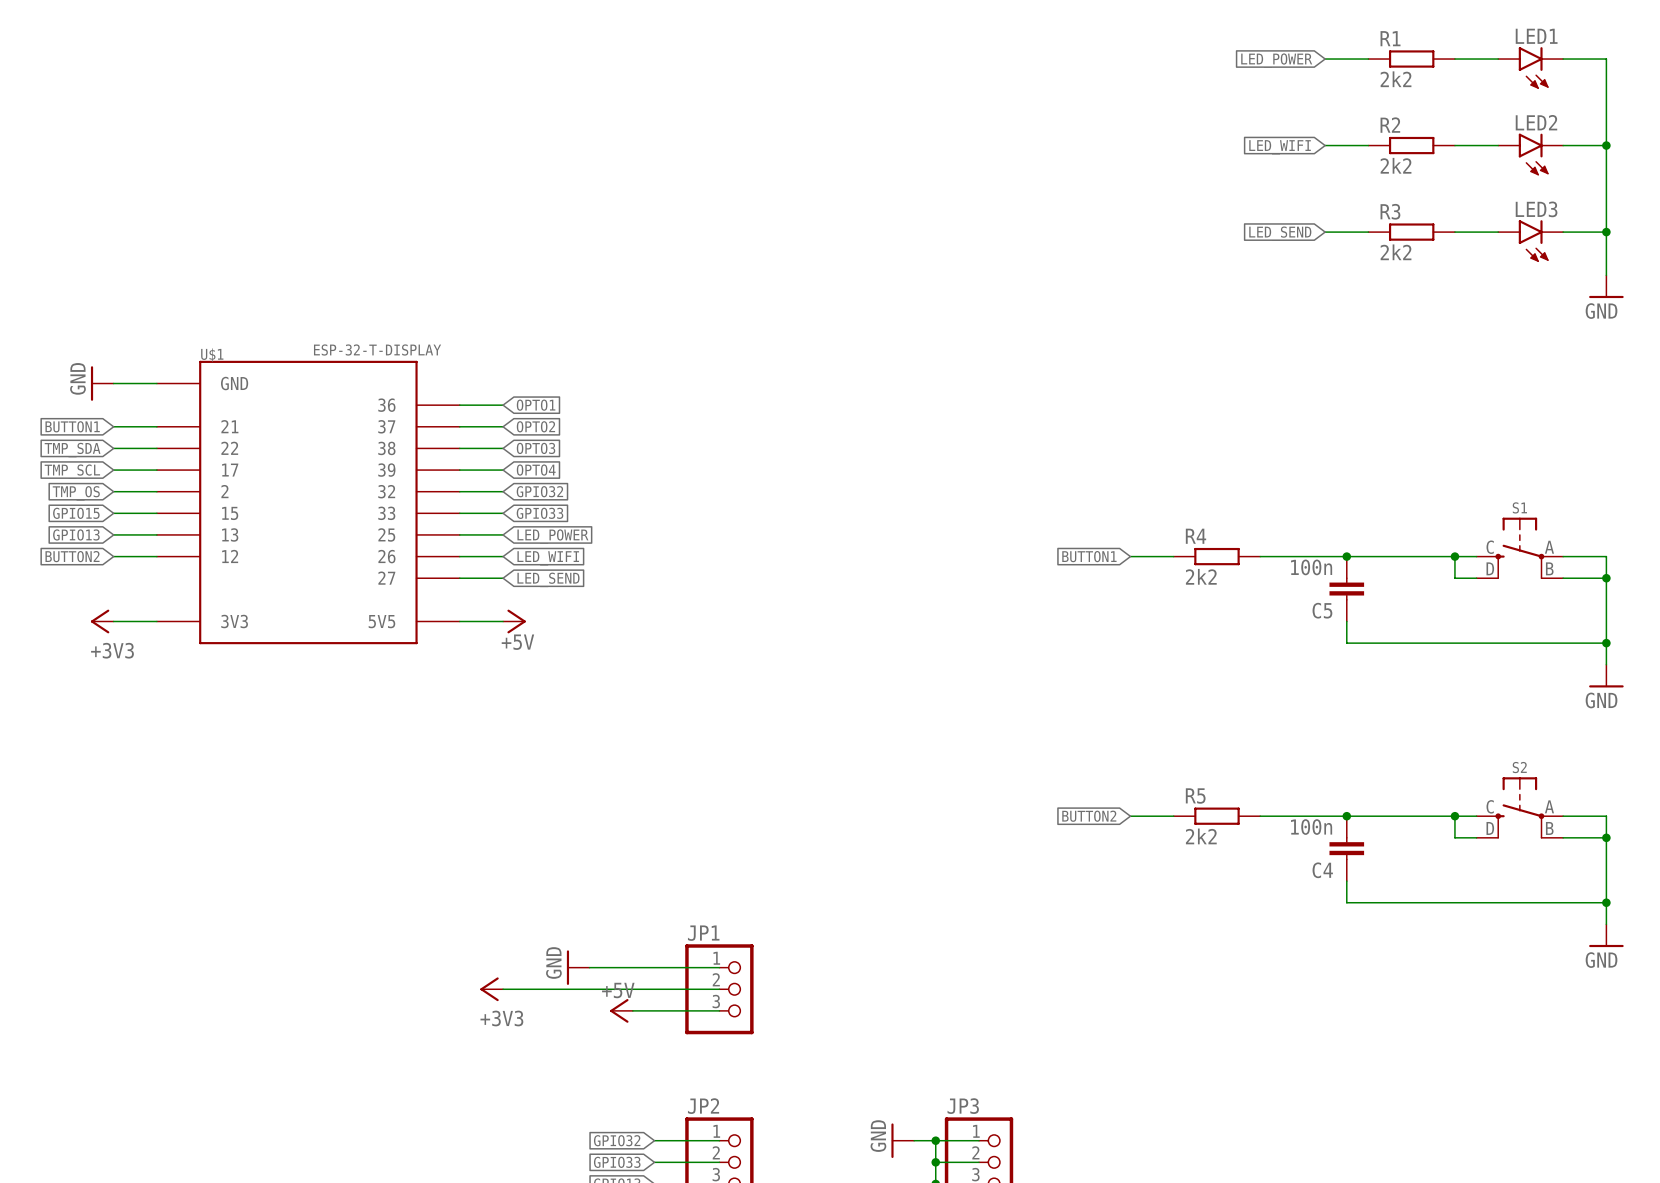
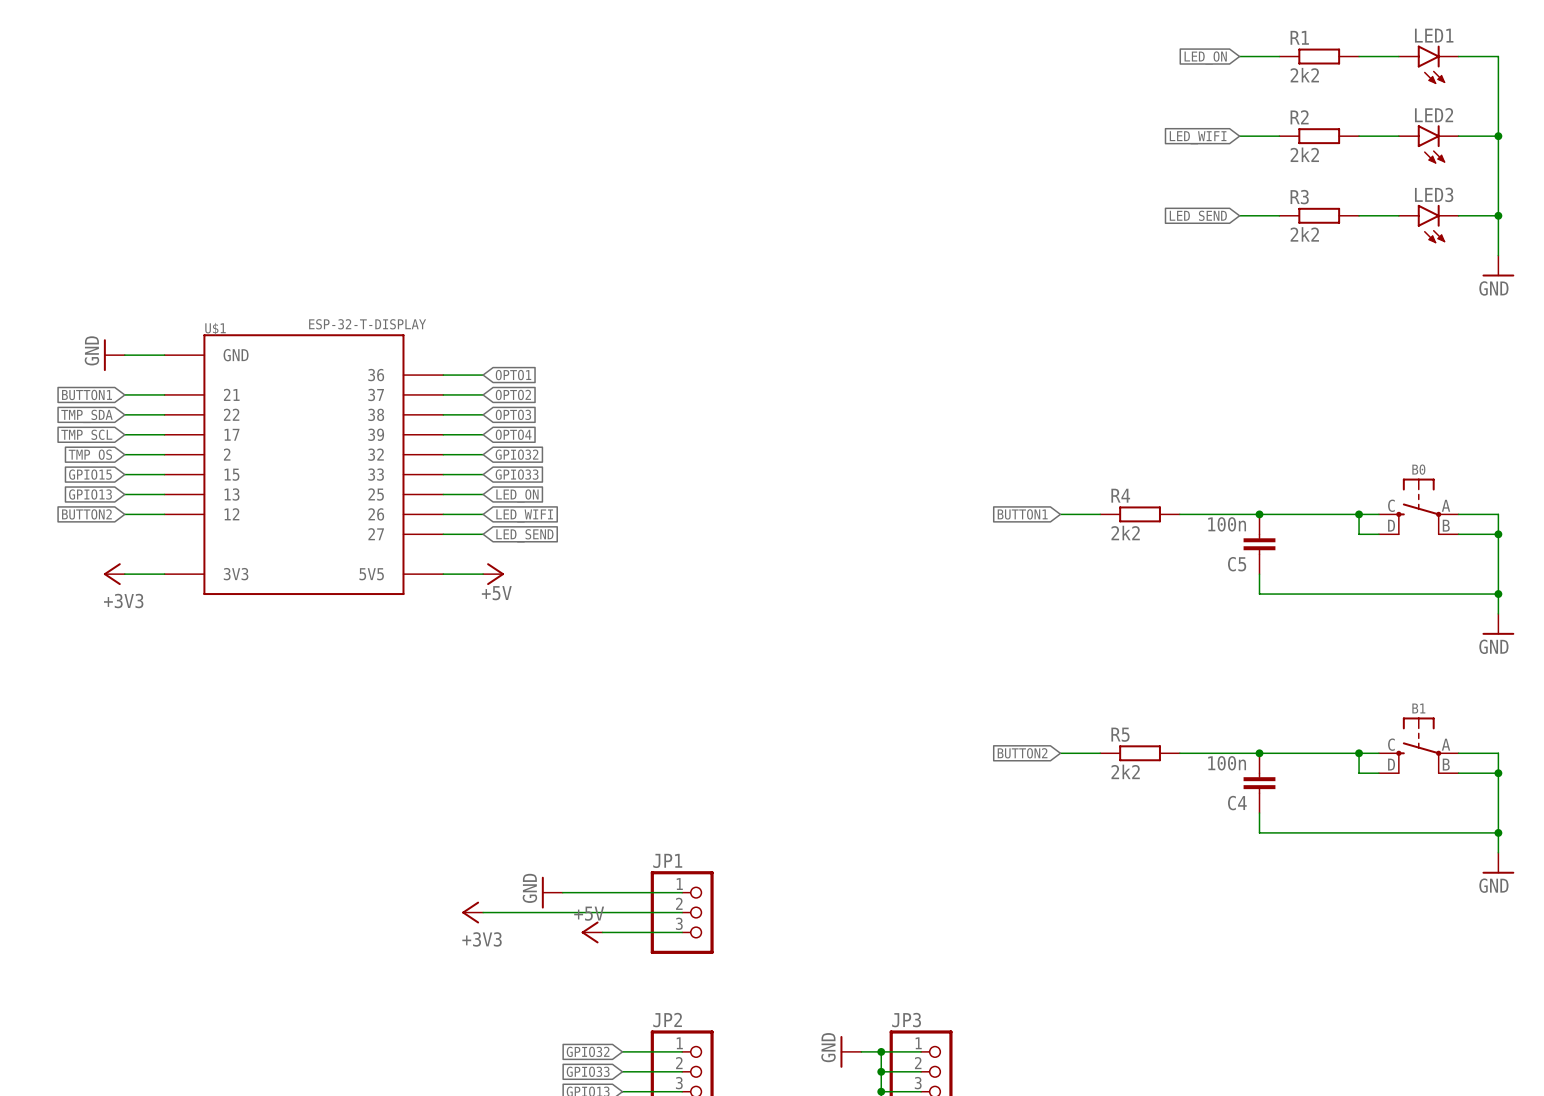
global label: LED_POWER (1276, 60) -> LED_ON (1205, 58)
S1 name: S1 (1519, 507) -> B0 (1418, 469)
global label: LED_POWER (552, 536) -> LED_ON (517, 496)
S2 name: S2 (1519, 767) -> B1 (1418, 708)

